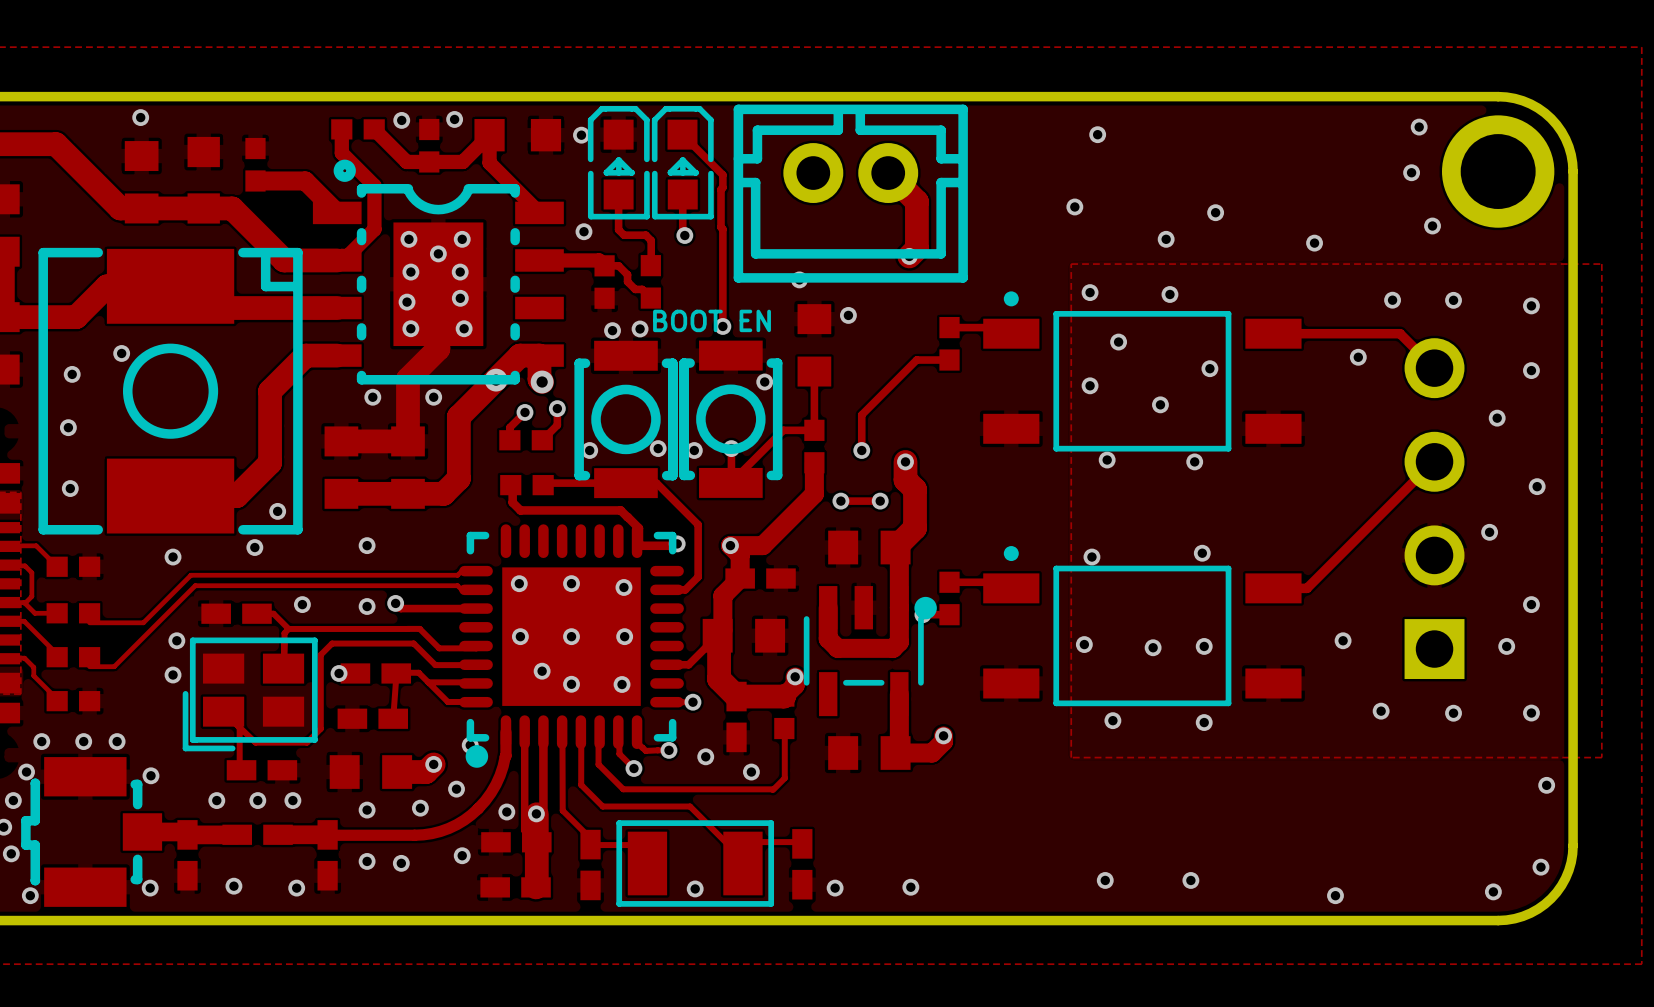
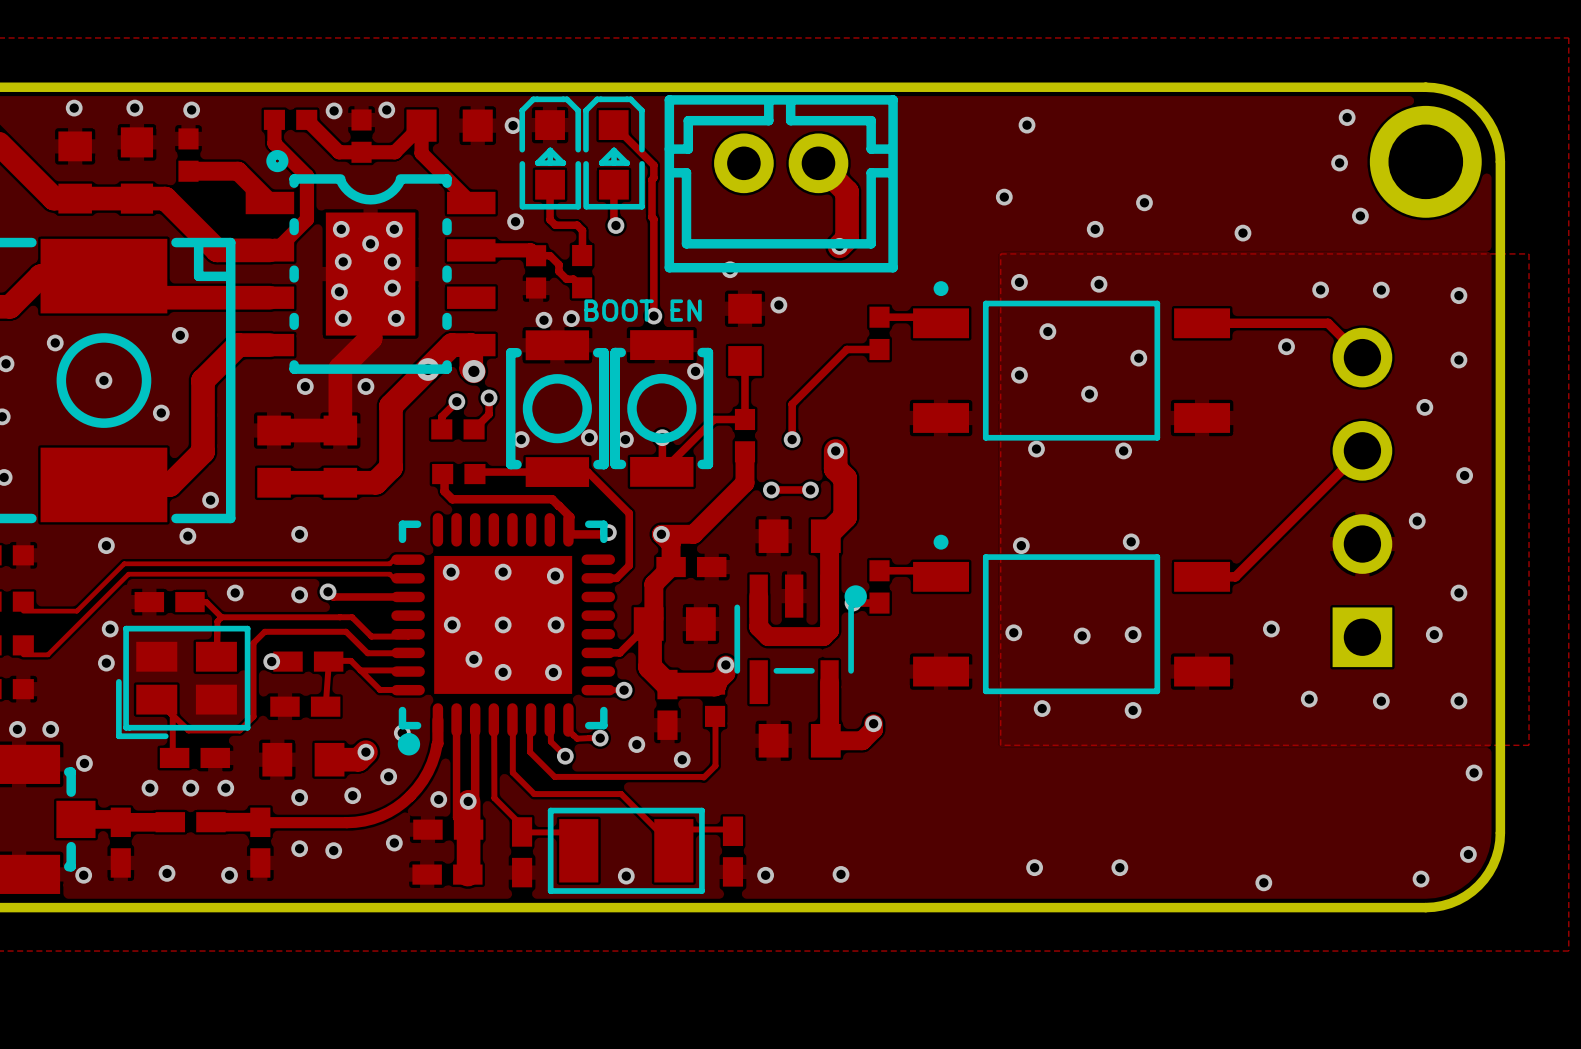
via: none -> (134, 108)
via: none -> (191, 109)
via: none -> (180, 335)
via: none -> (103, 380)
via: none -> (161, 413)

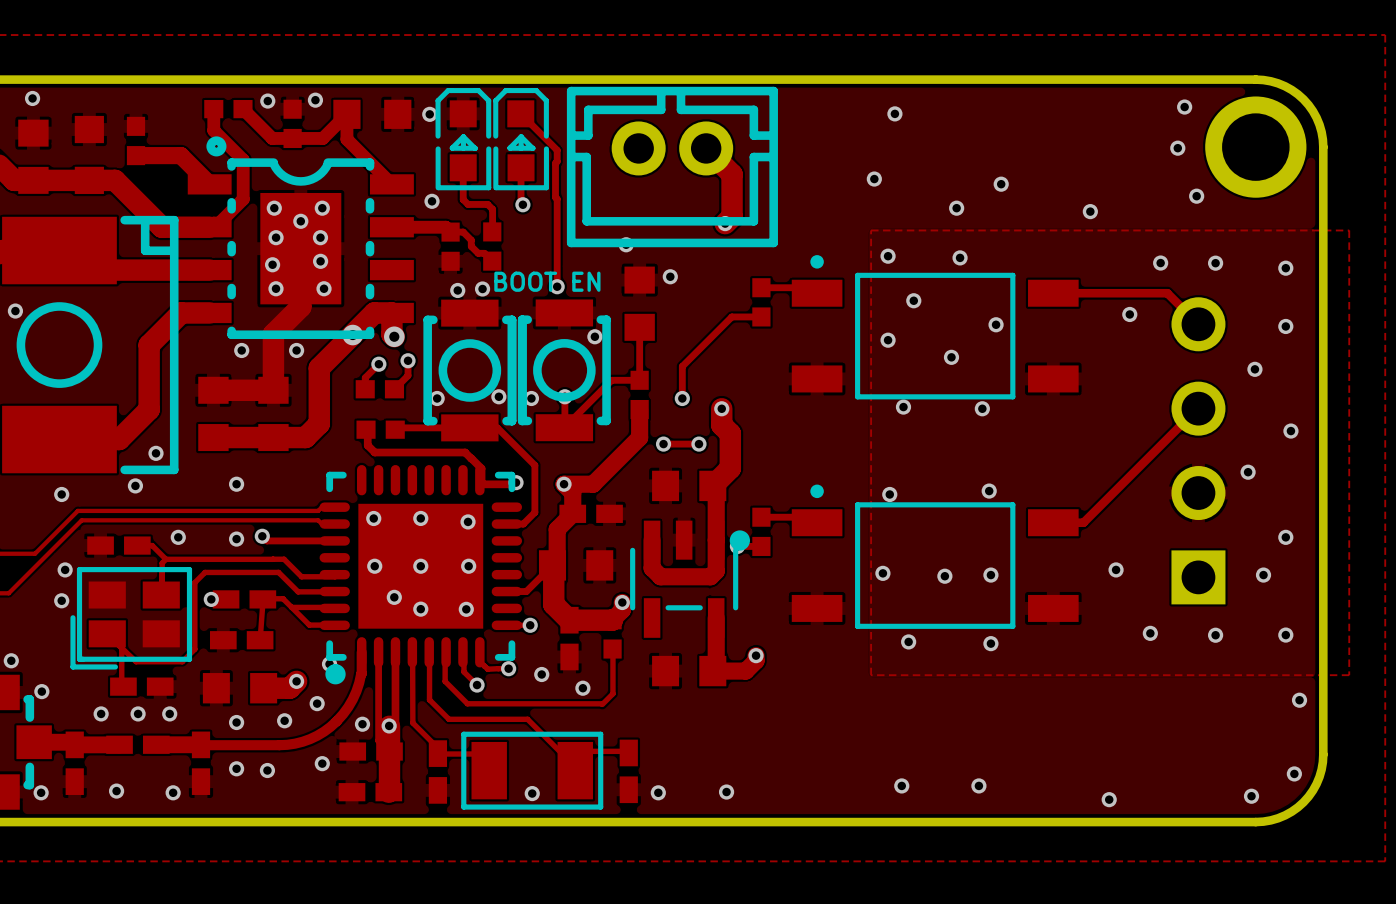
via: (134, 108) -> none
via: (191, 109) -> none
via: (180, 335) -> none
via: (103, 380) -> none
via: (161, 413) -> none

